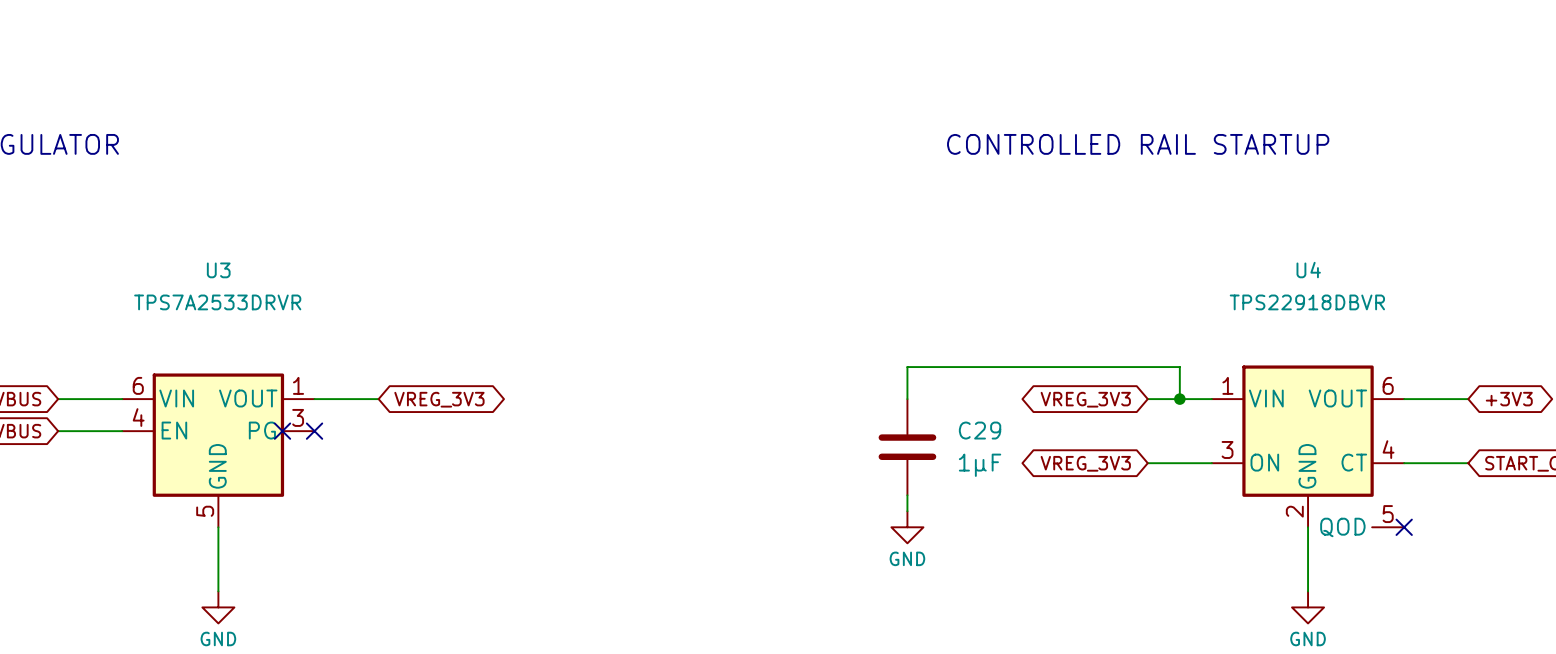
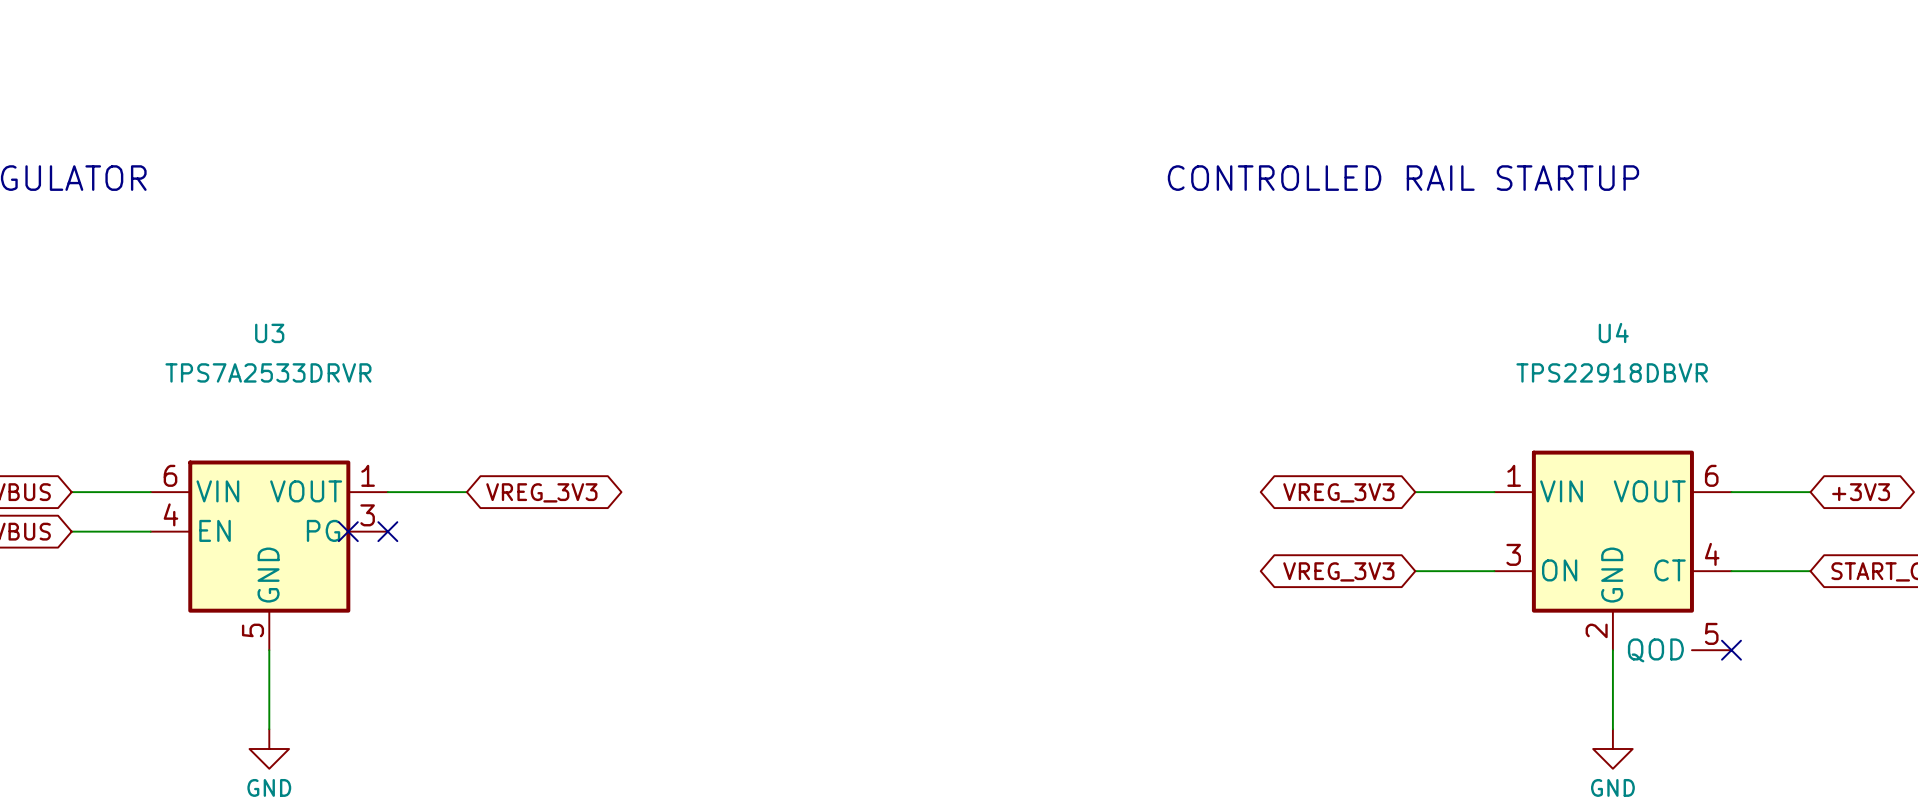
wire: (907, 399) (907, 367) (1179, 367) (1179, 399) -> none
junction: (1179, 399) -> none
C29: 1µF (907, 447) -> none
wire: (907, 495) (907, 511) -> none
power symbol: GND (907, 527) -> none

